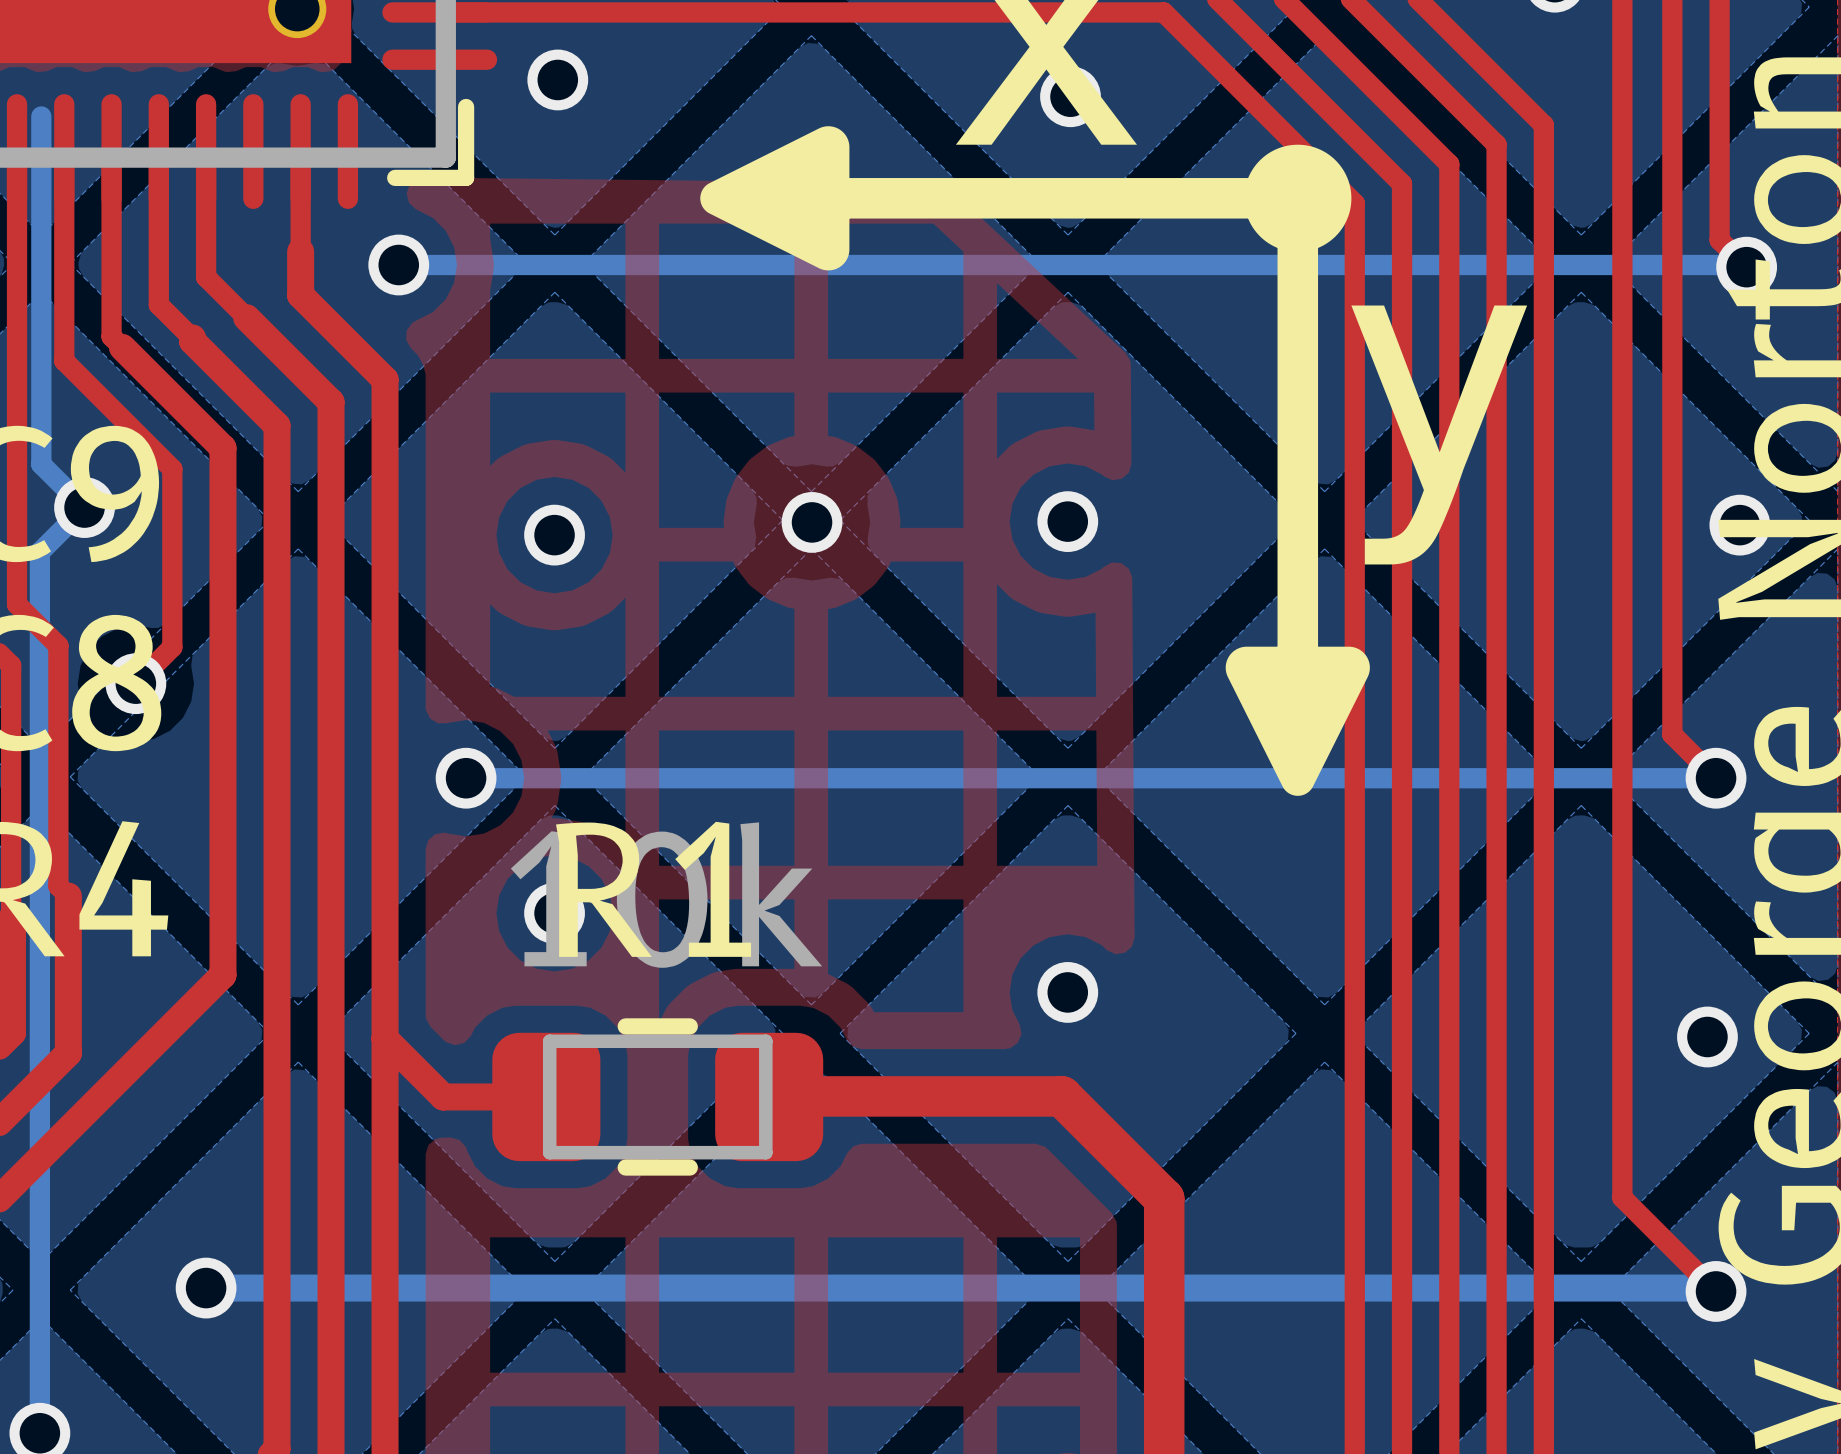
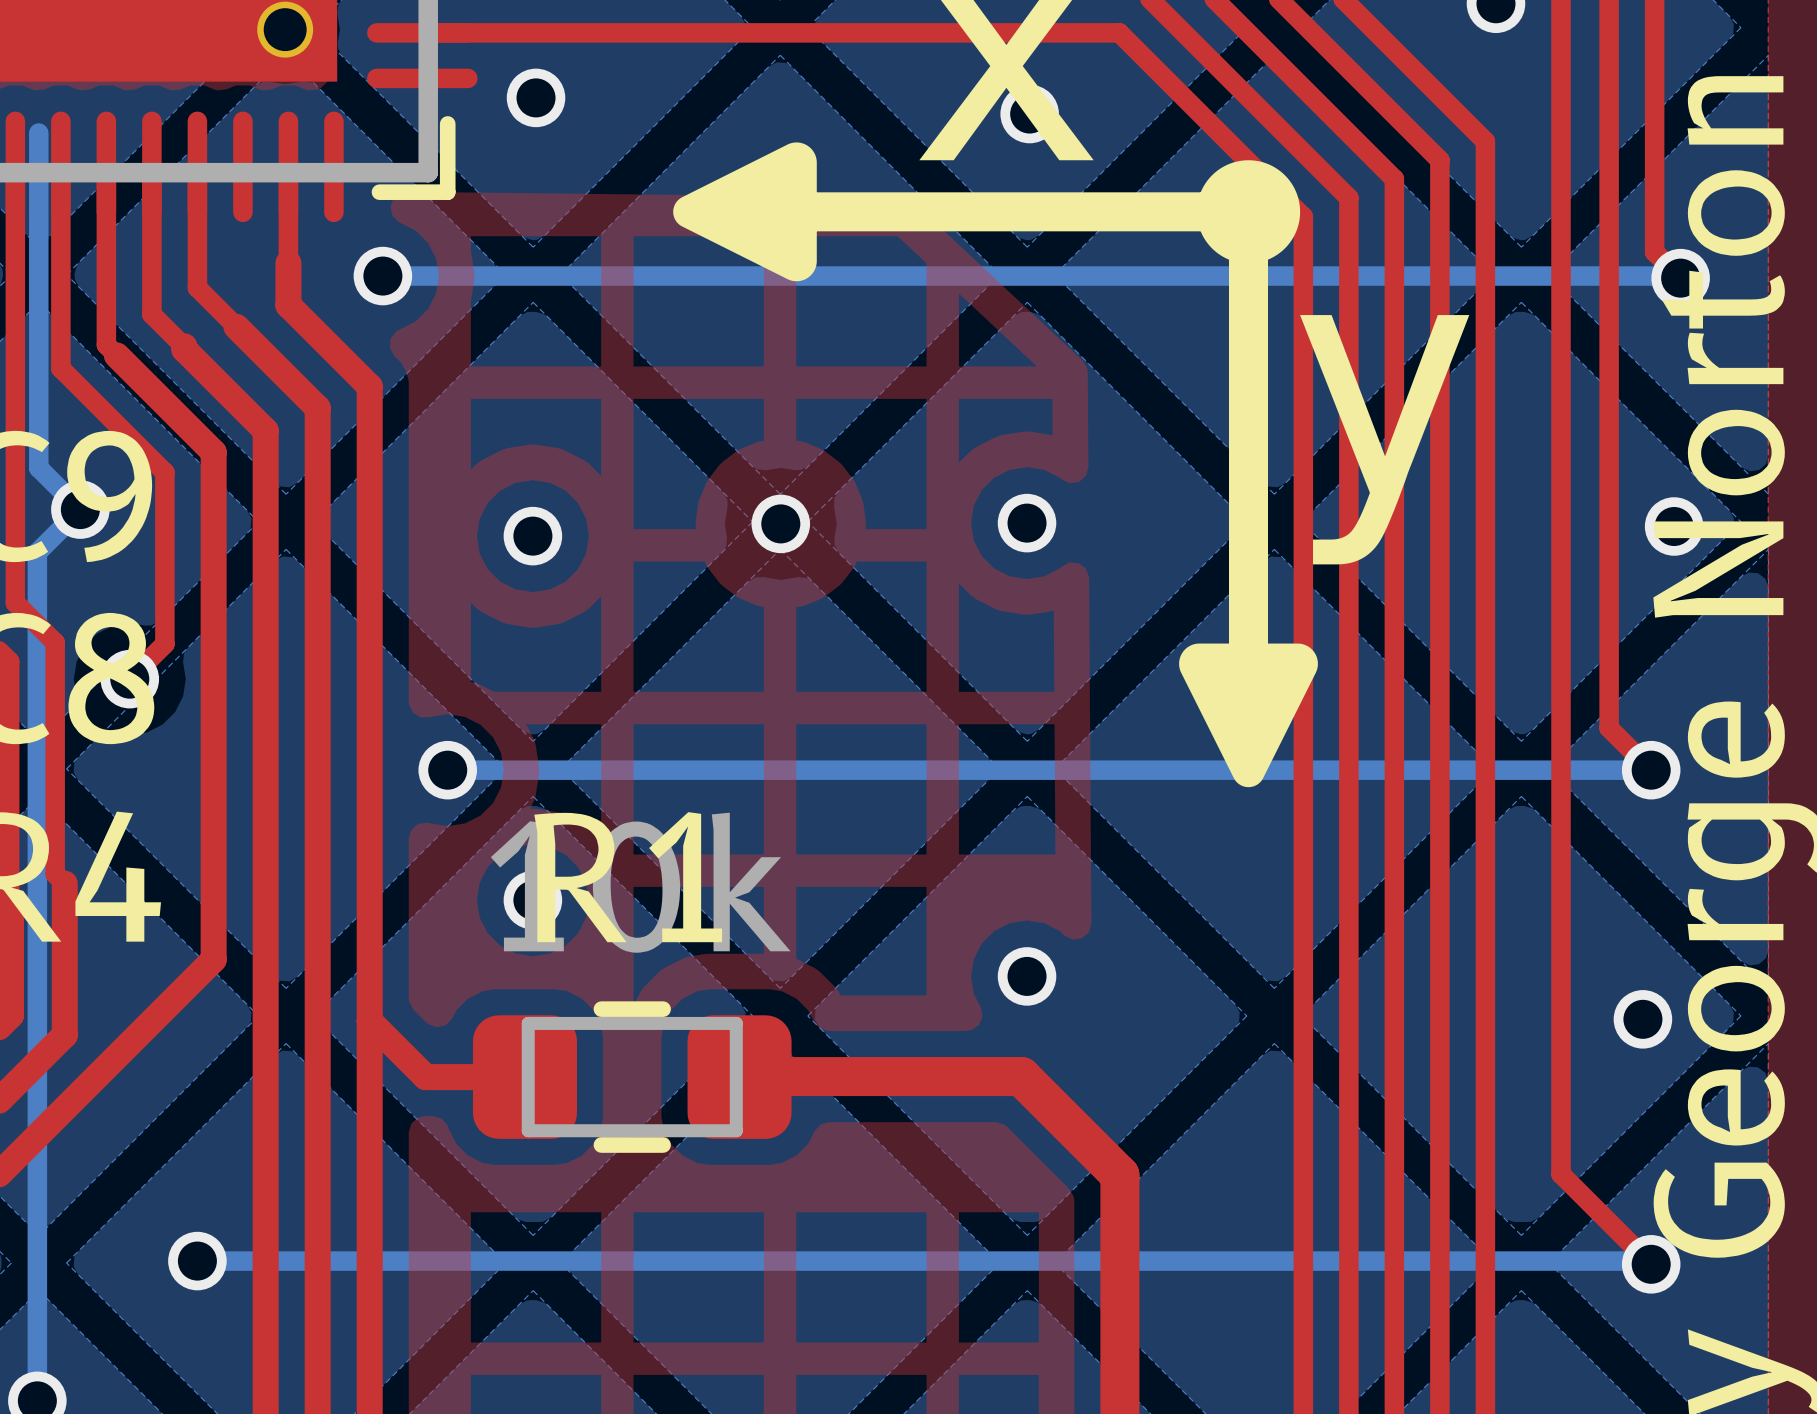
bottom track width: thick (206, 1288) (1712, 1288) (1716, 1291) -> thin (197, 1261) (1647, 1261) (1651, 1264)

